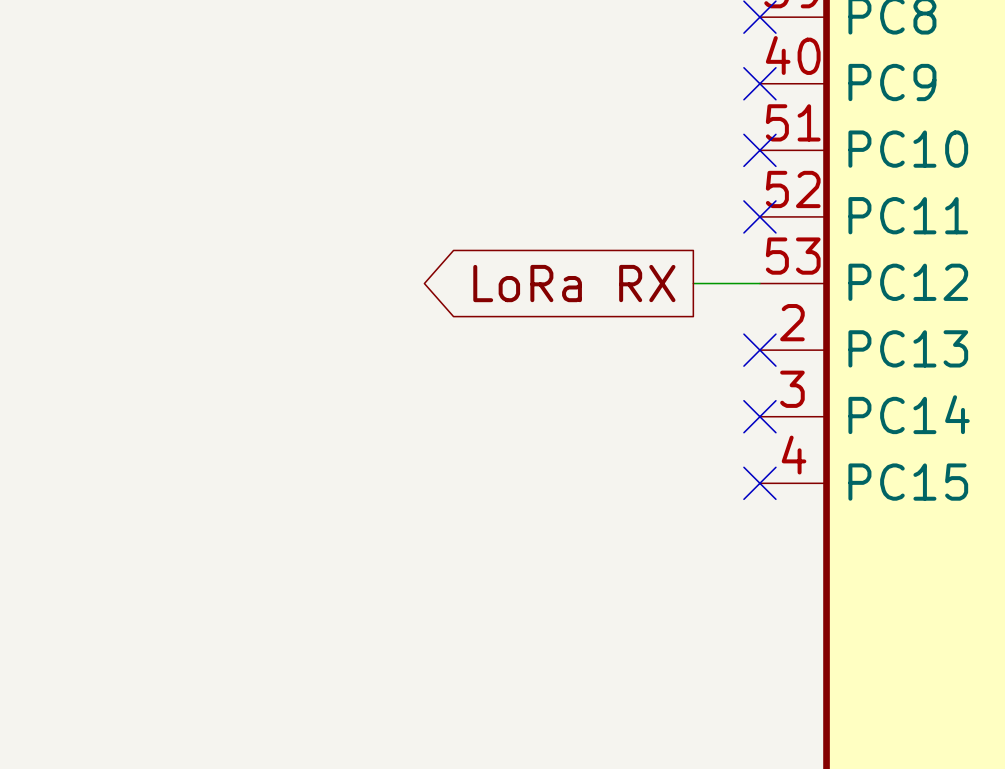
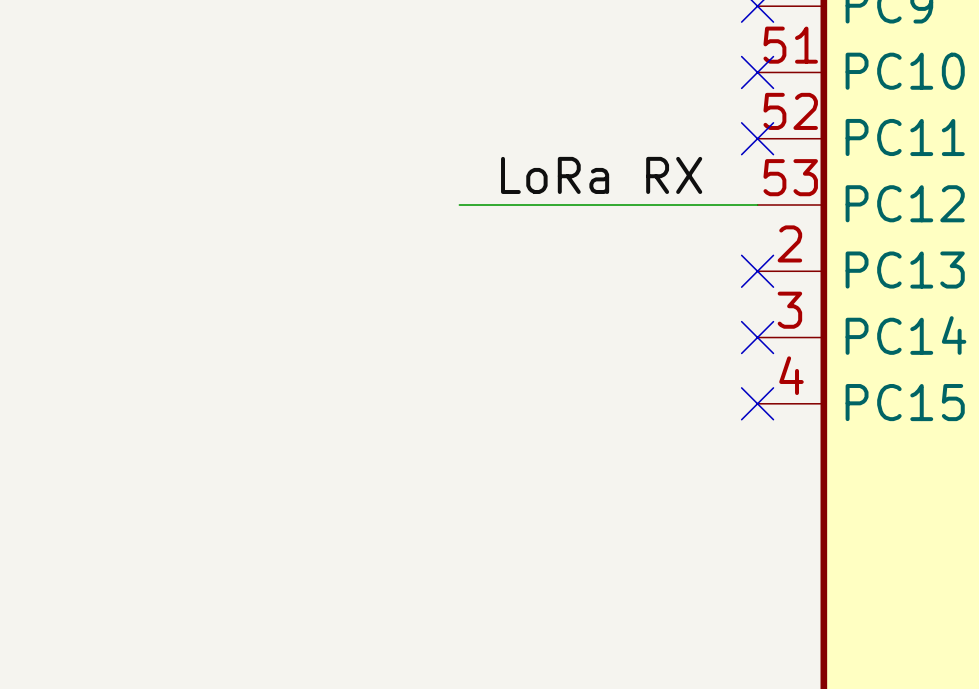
label: none -> LoRa RX (601, 175)
wire: none -> (459, 205) (691, 205)
global label: LoRa RX (574, 283) -> none

